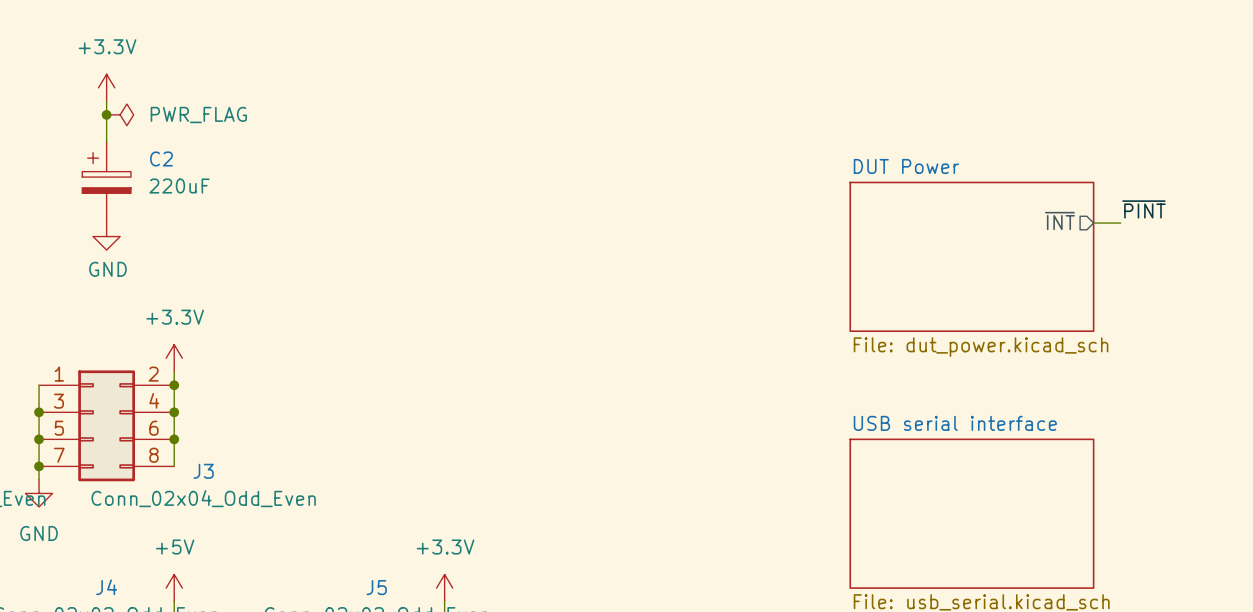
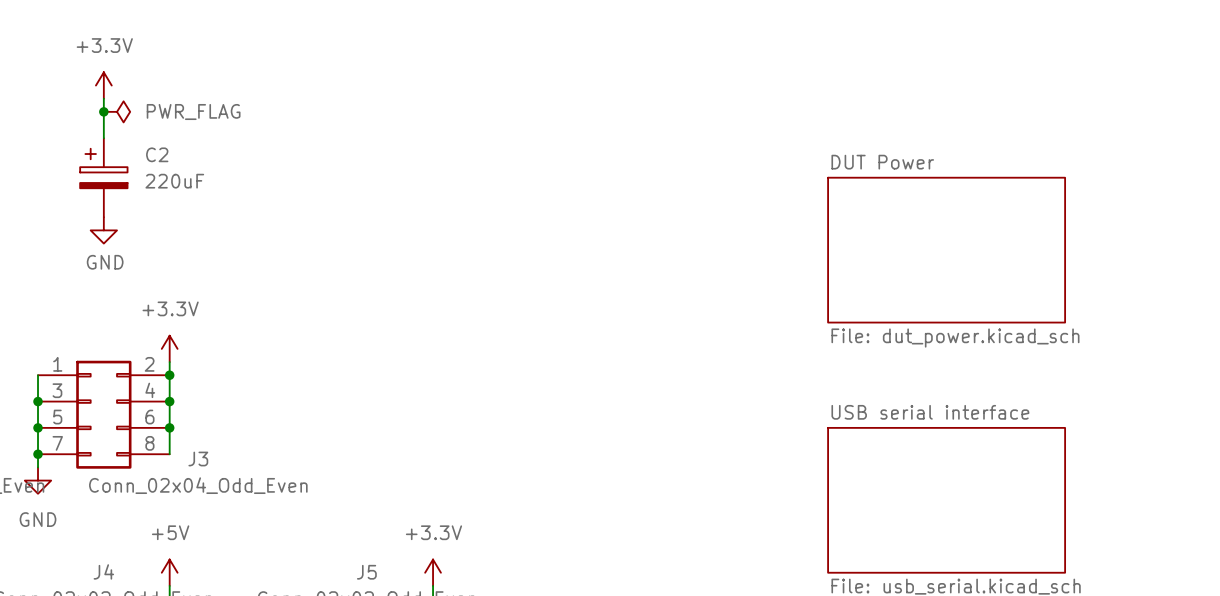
label: ~{PINT} (1143, 209) -> none
sheet pin: ~{INT} (1059, 220) -> none
wire: (1093, 223) (1120, 223) -> none

